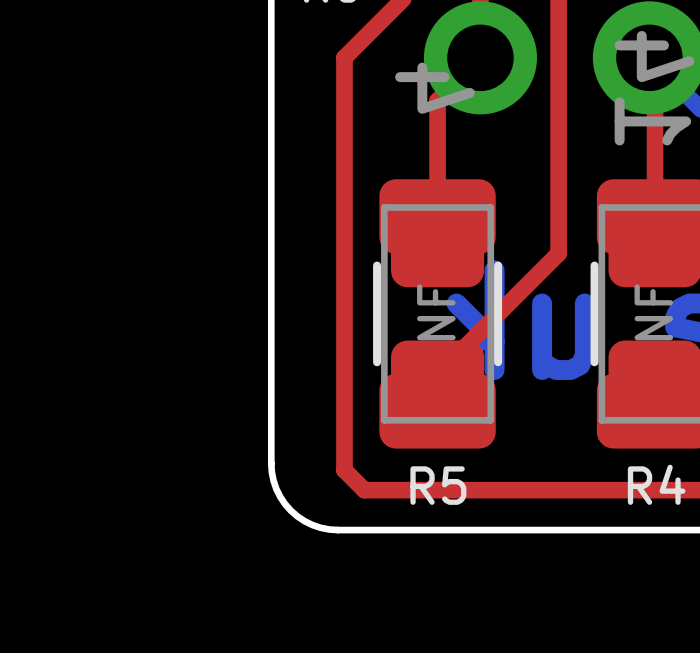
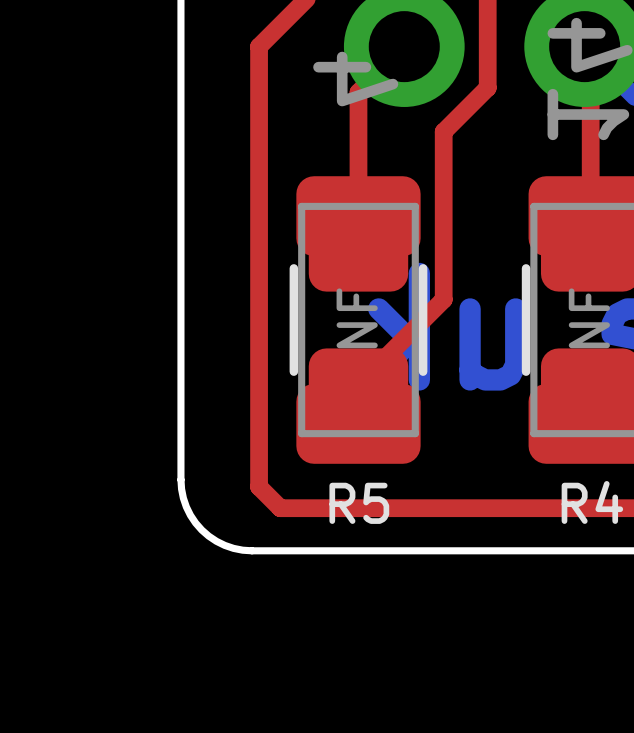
top track: (558, 96) (558, 253) (517, 294) -> (487, 87) (443, 131) (443, 299)

